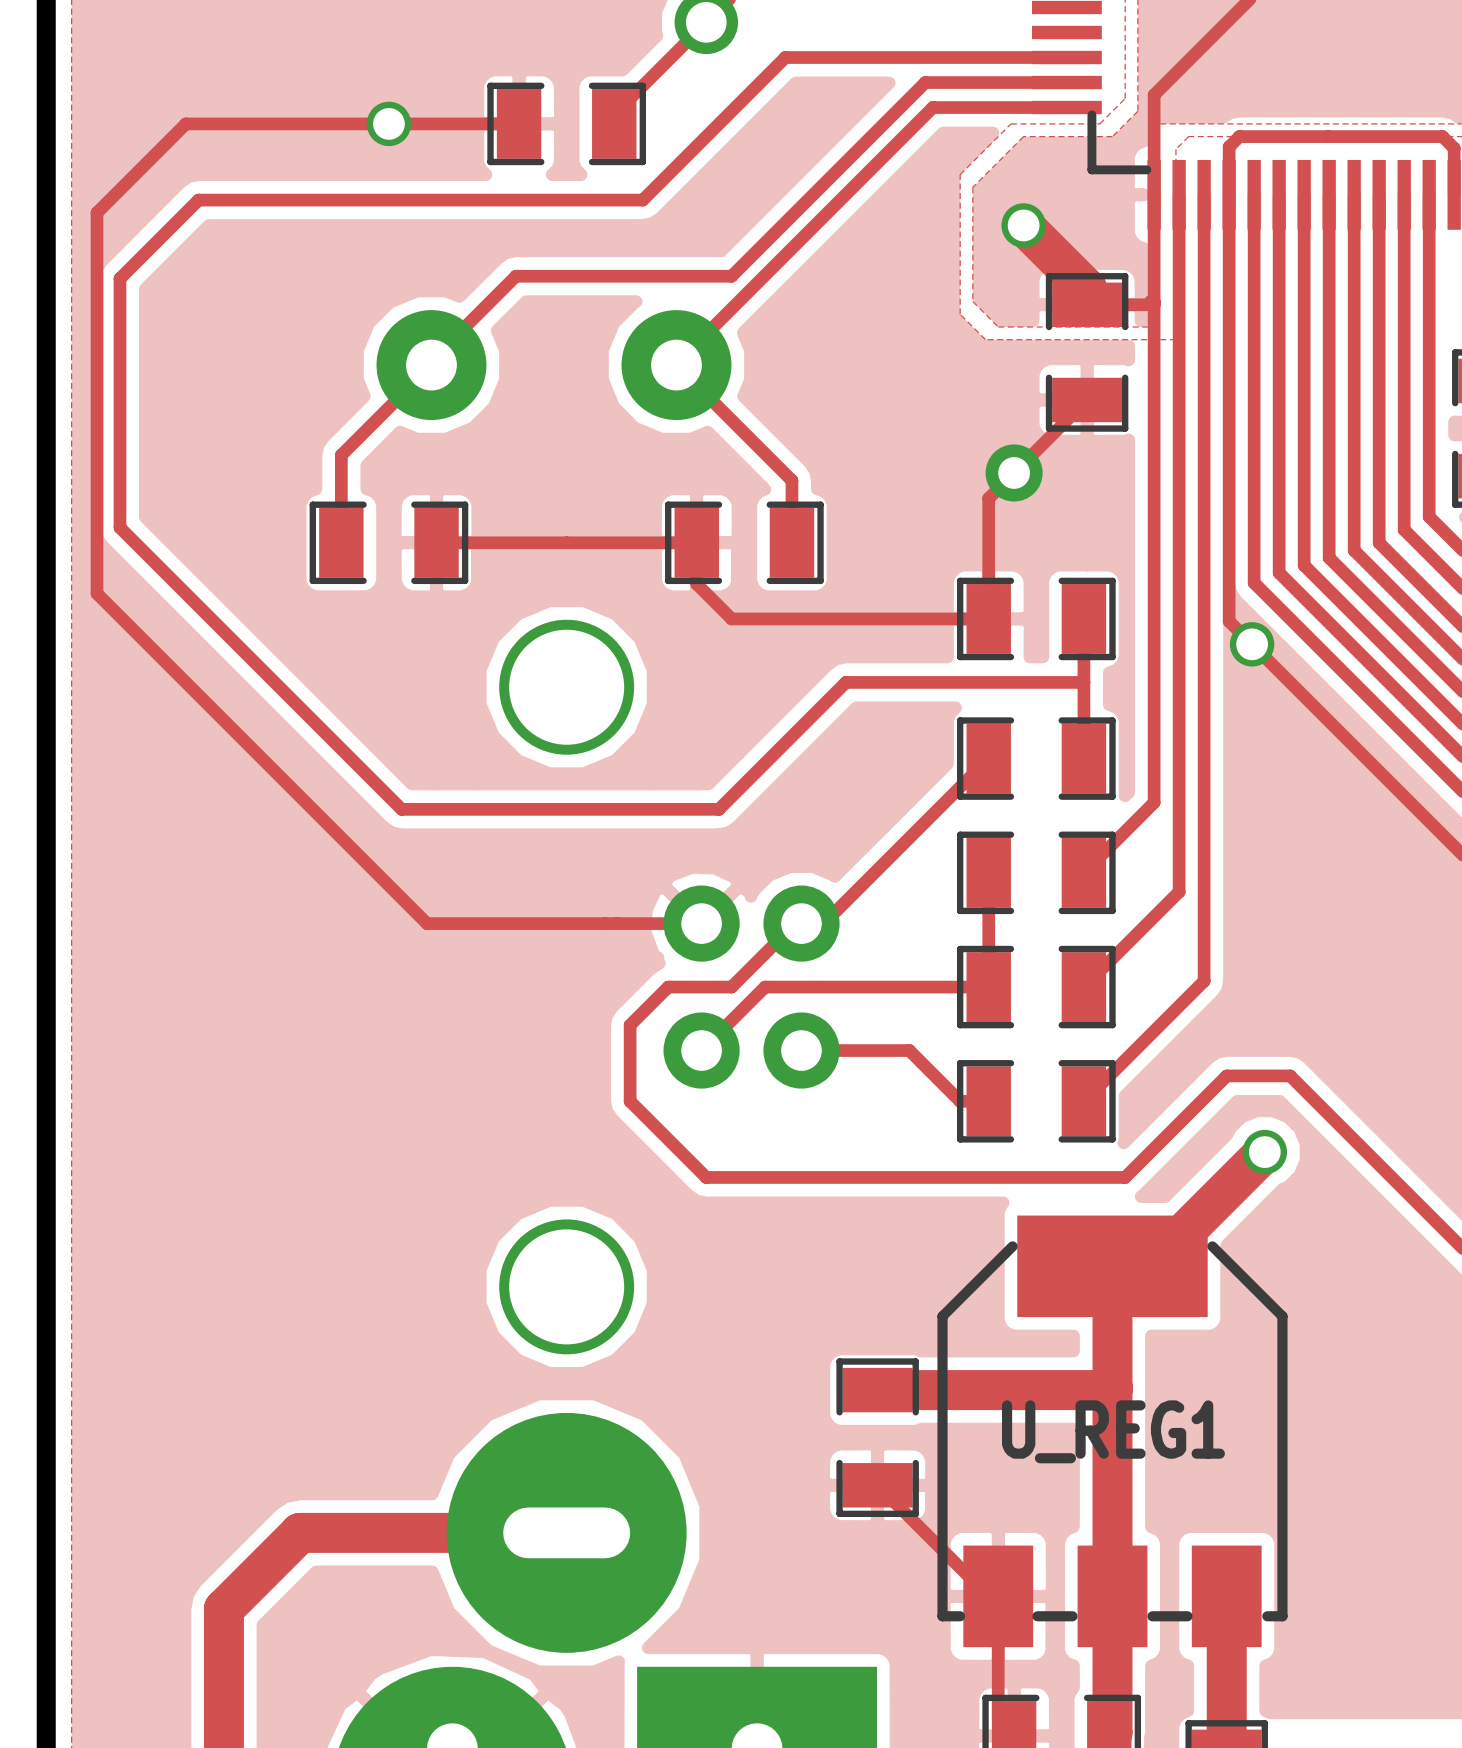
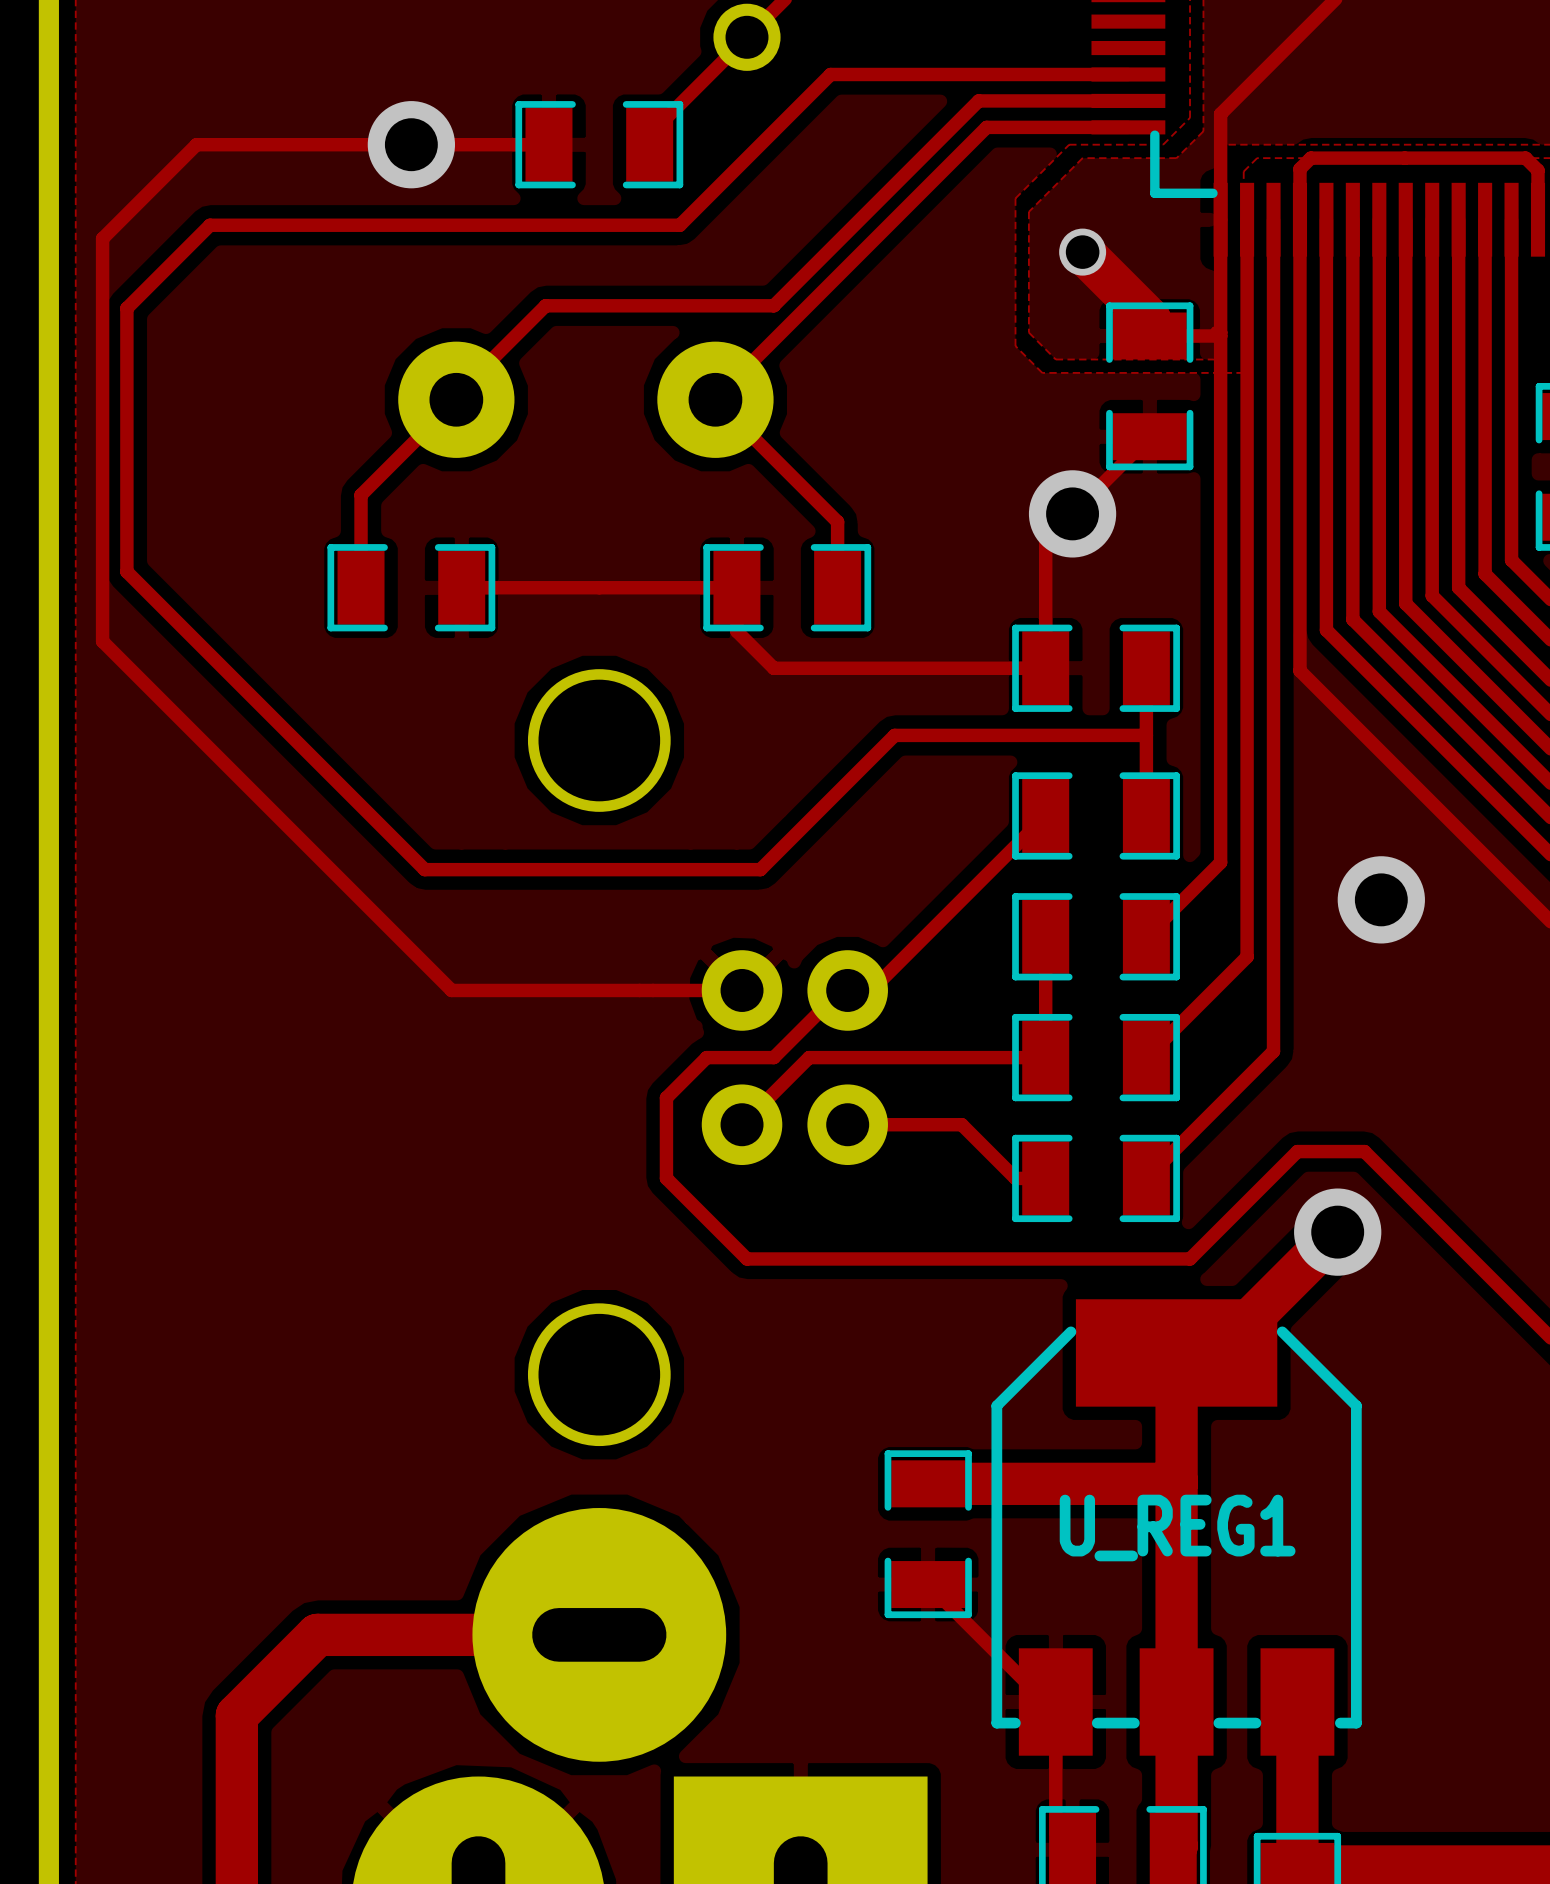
via size: [366, 101, 412, 147] -> [367, 101, 456, 189]
via size: [985, 444, 1043, 502] -> [1028, 470, 1117, 558]
via: (1252, 644) -> none
via: none -> (1381, 899)
via size: [1242, 1129, 1288, 1175] -> [1294, 1188, 1382, 1276]

